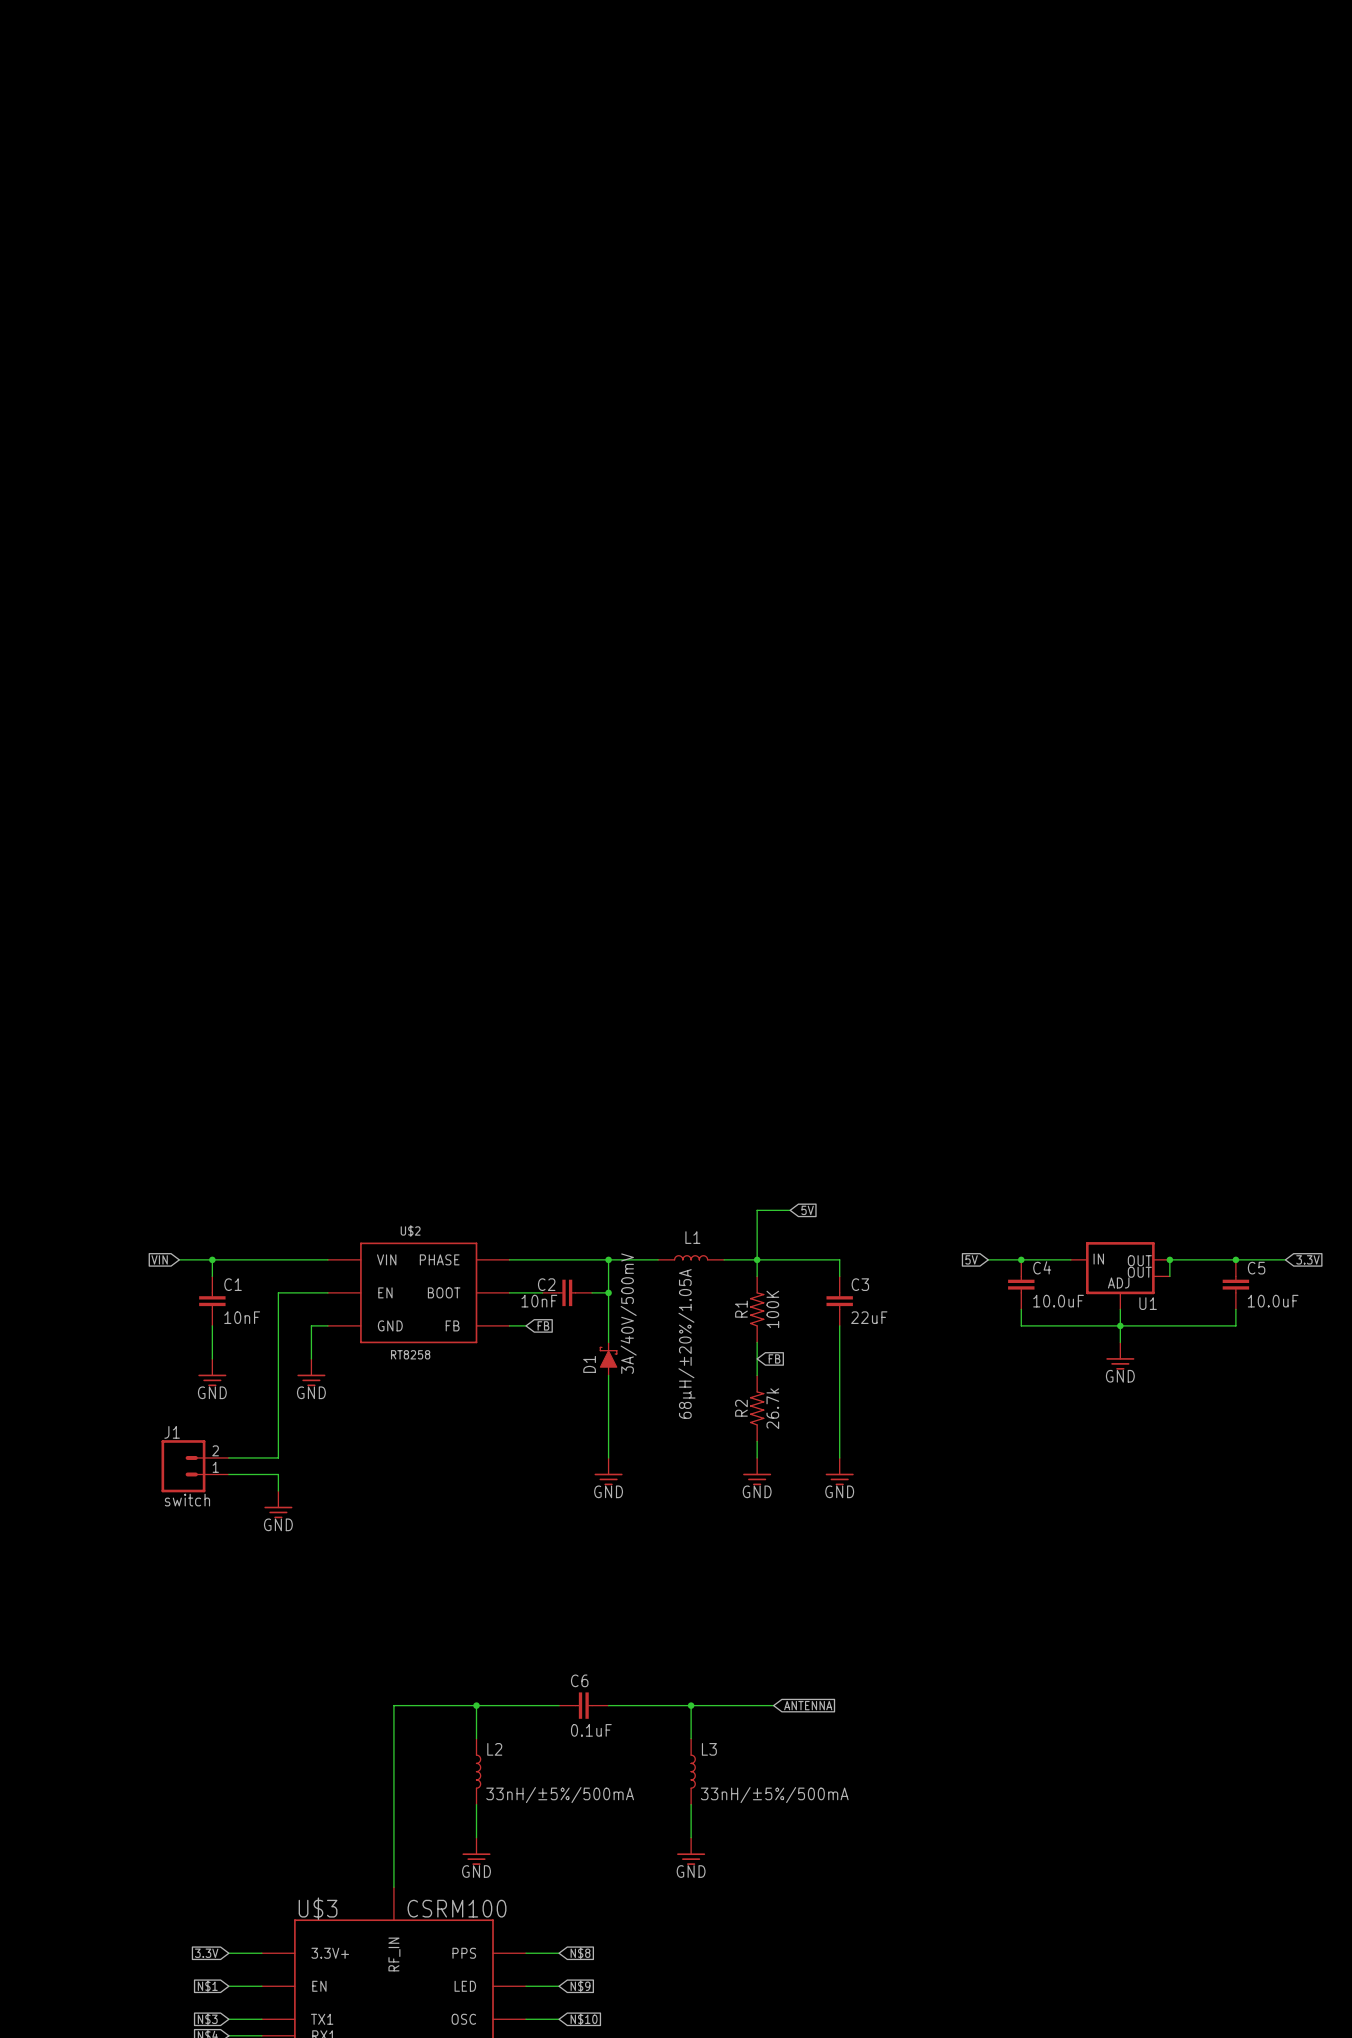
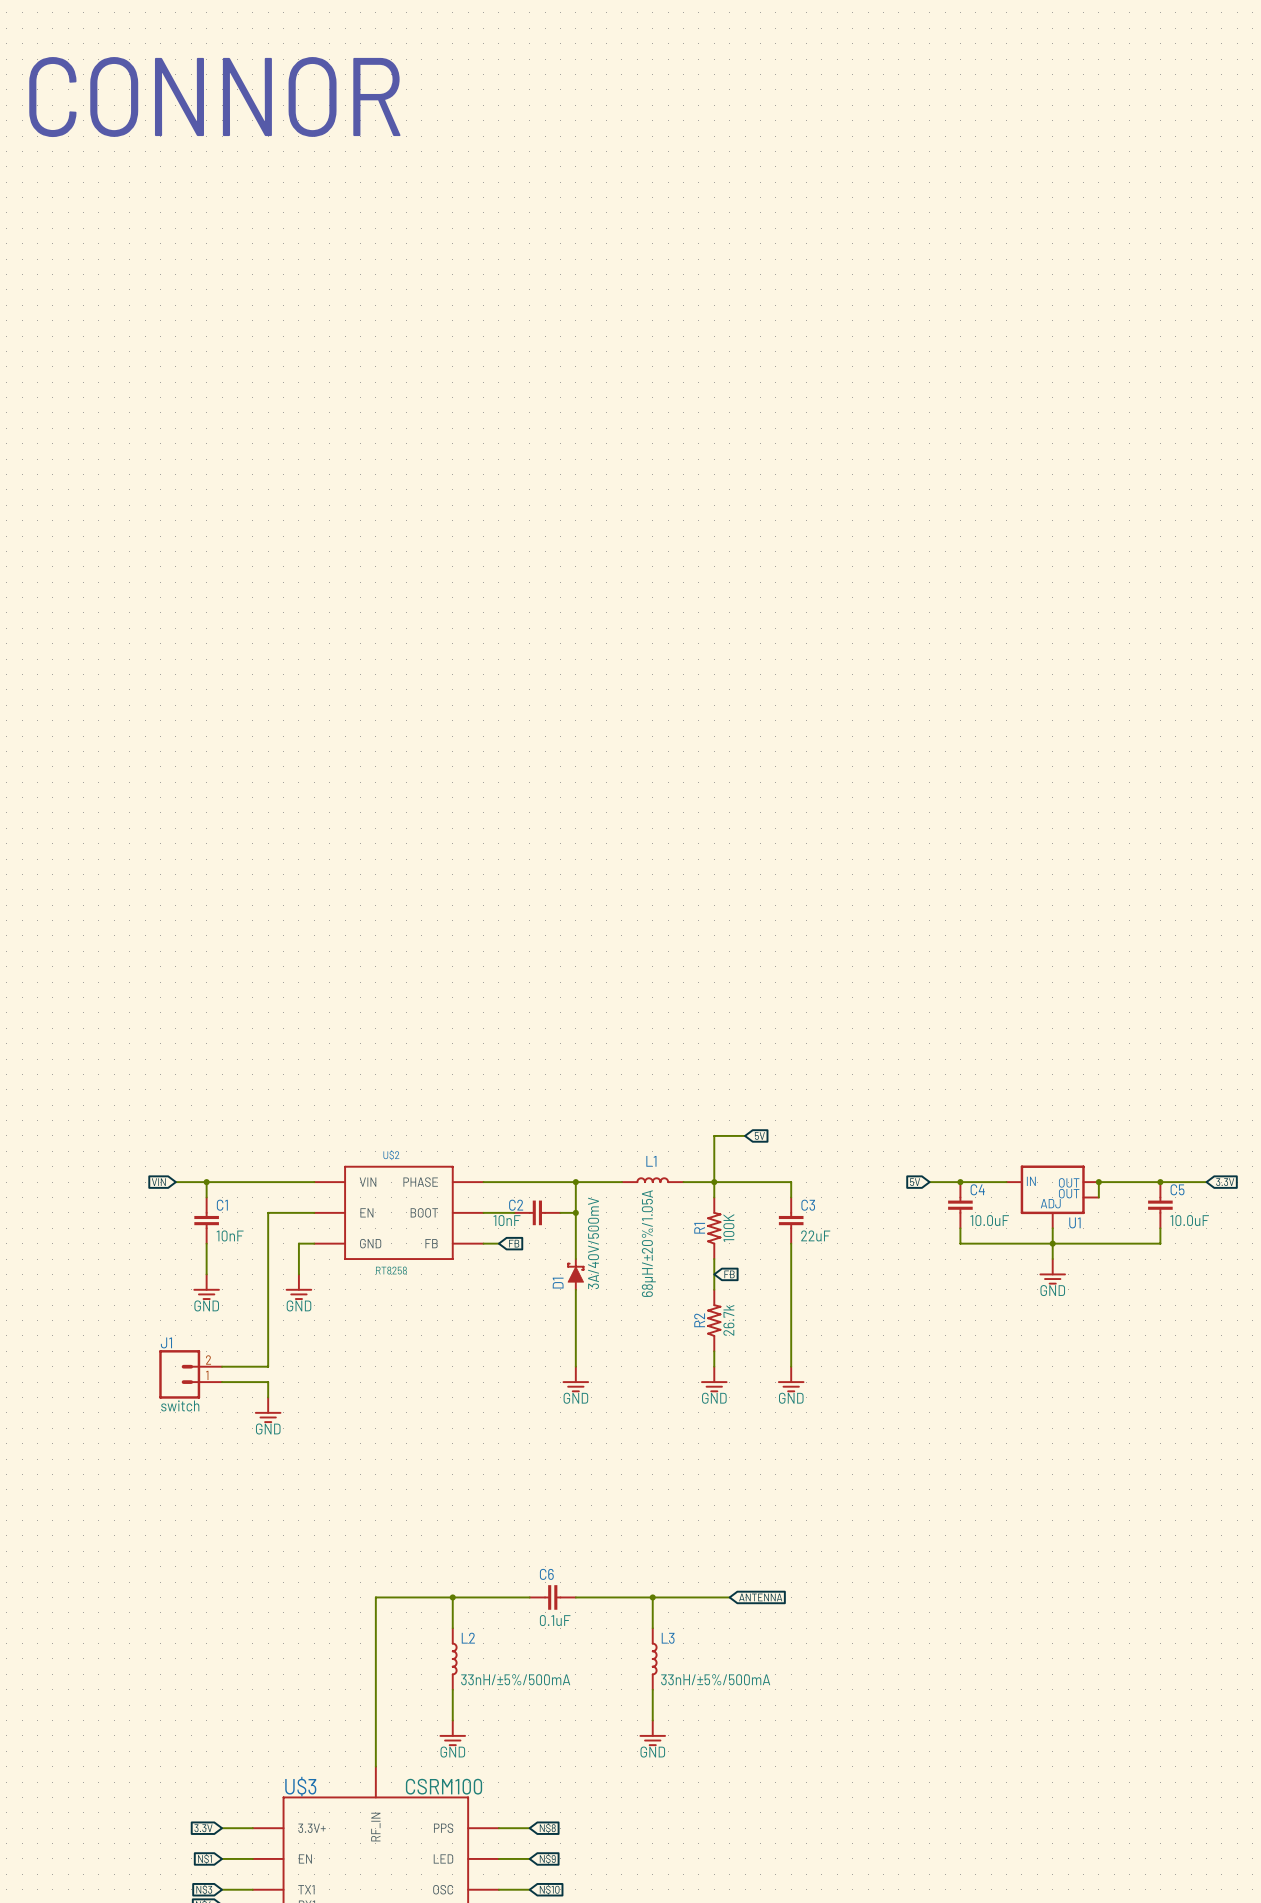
text: none -> CONNOR (214, 97)

